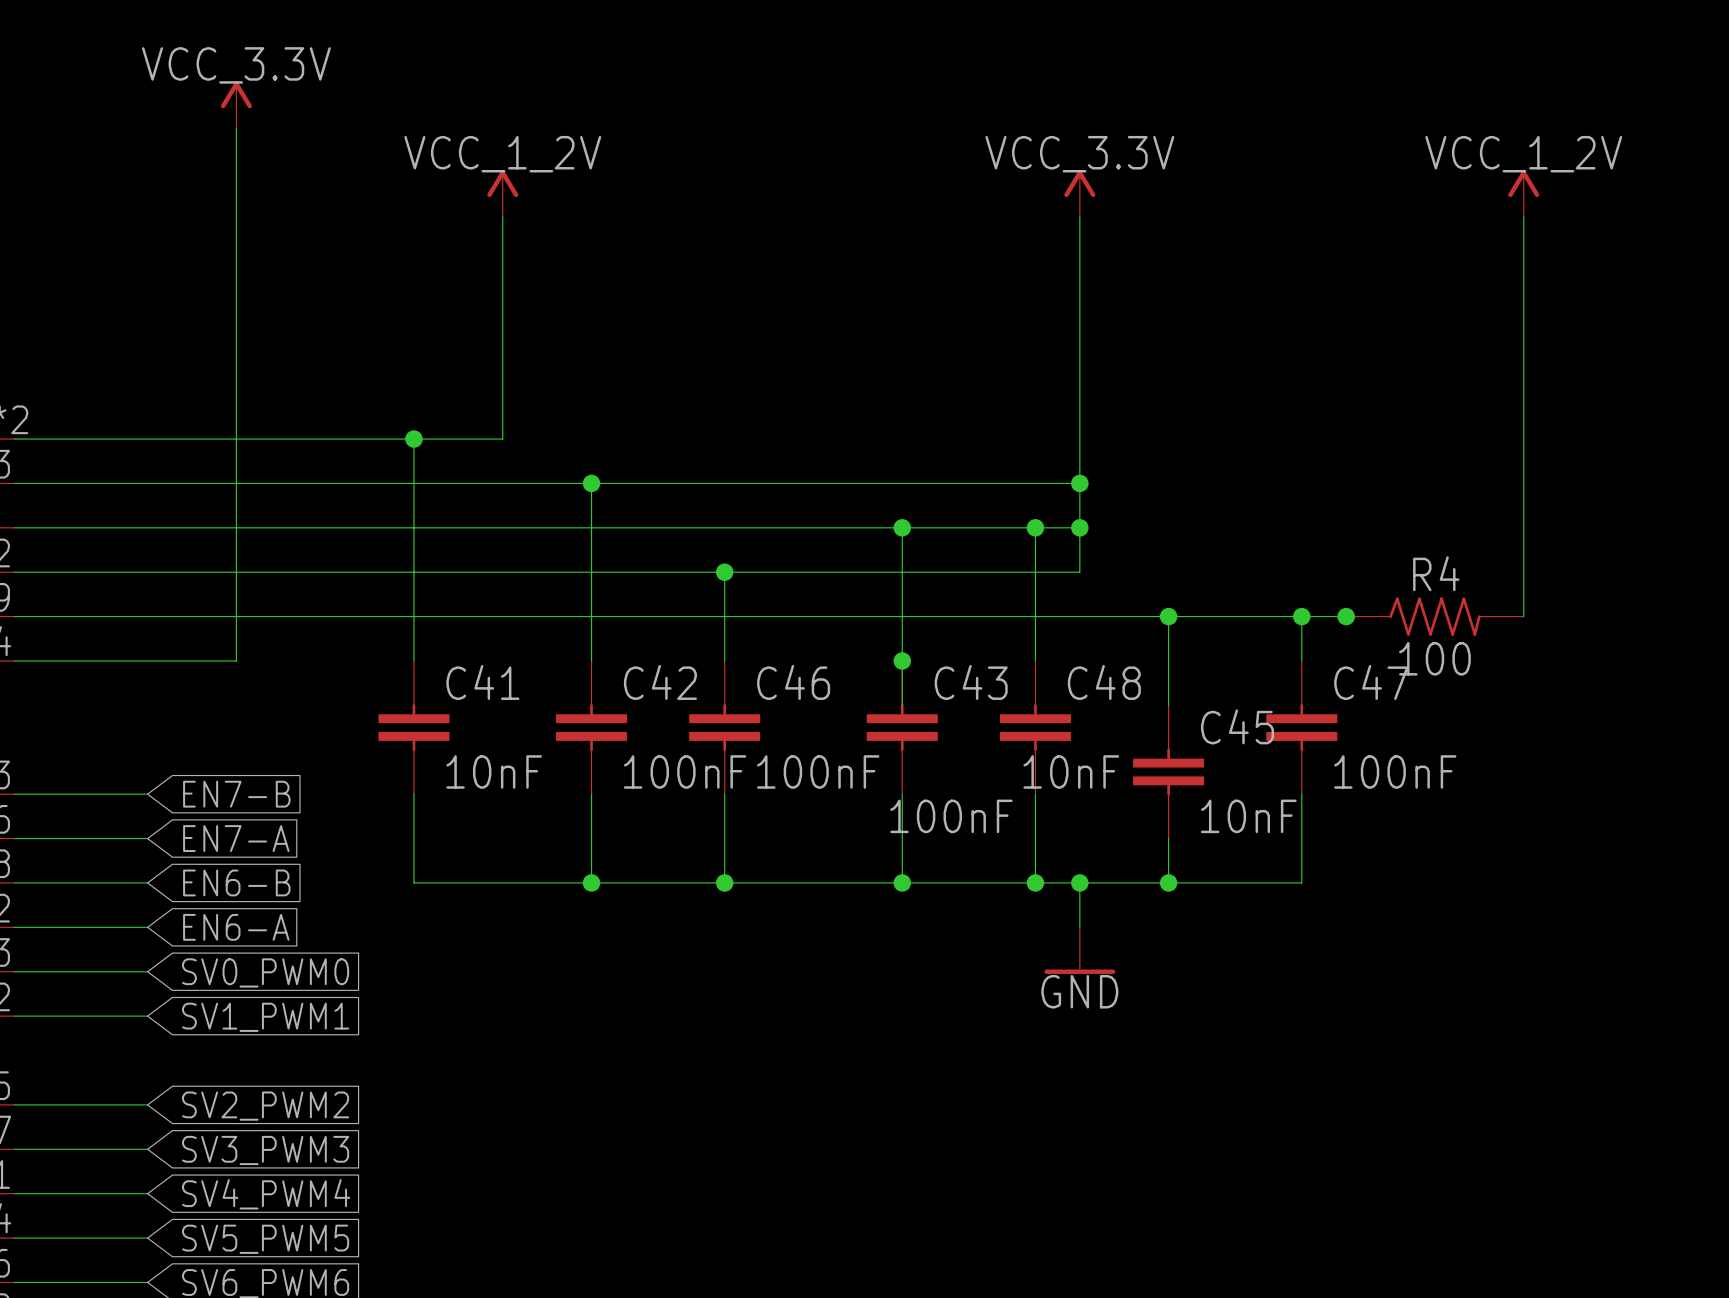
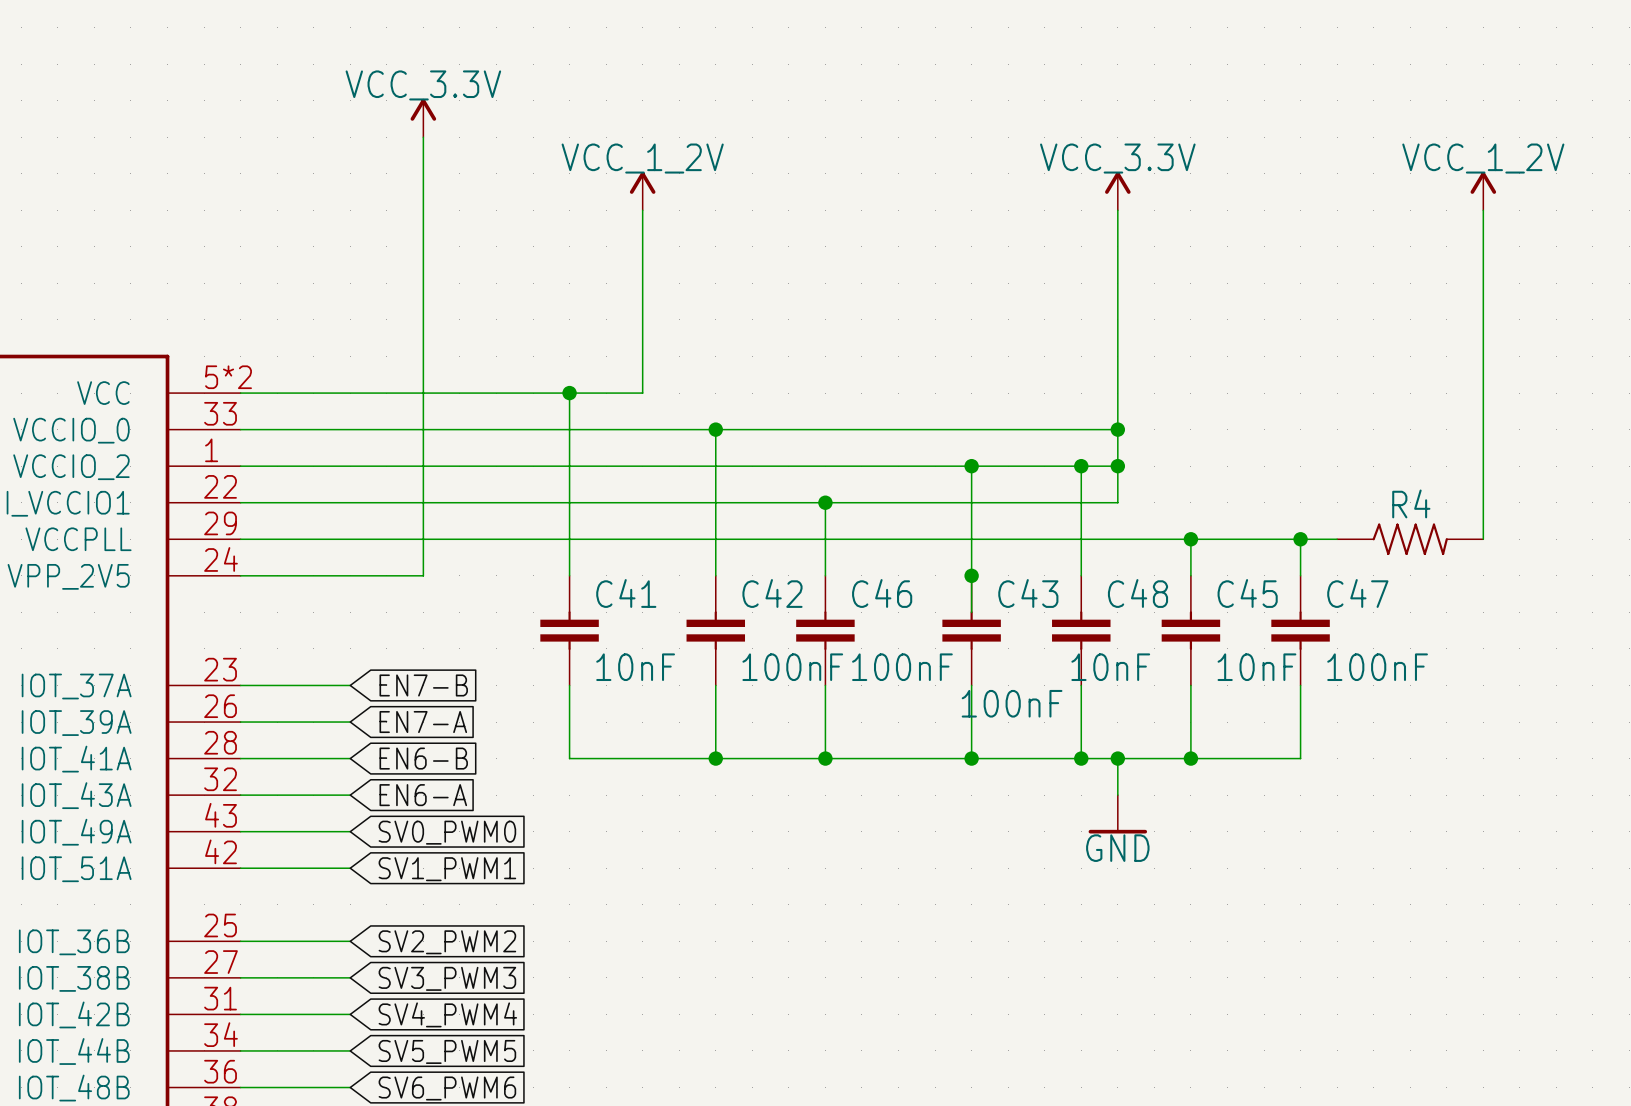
junction: (1346, 616) -> none
R4 value: 100 (1434, 658) -> none
C45 position: (1168, 771) -> (1190, 630)

